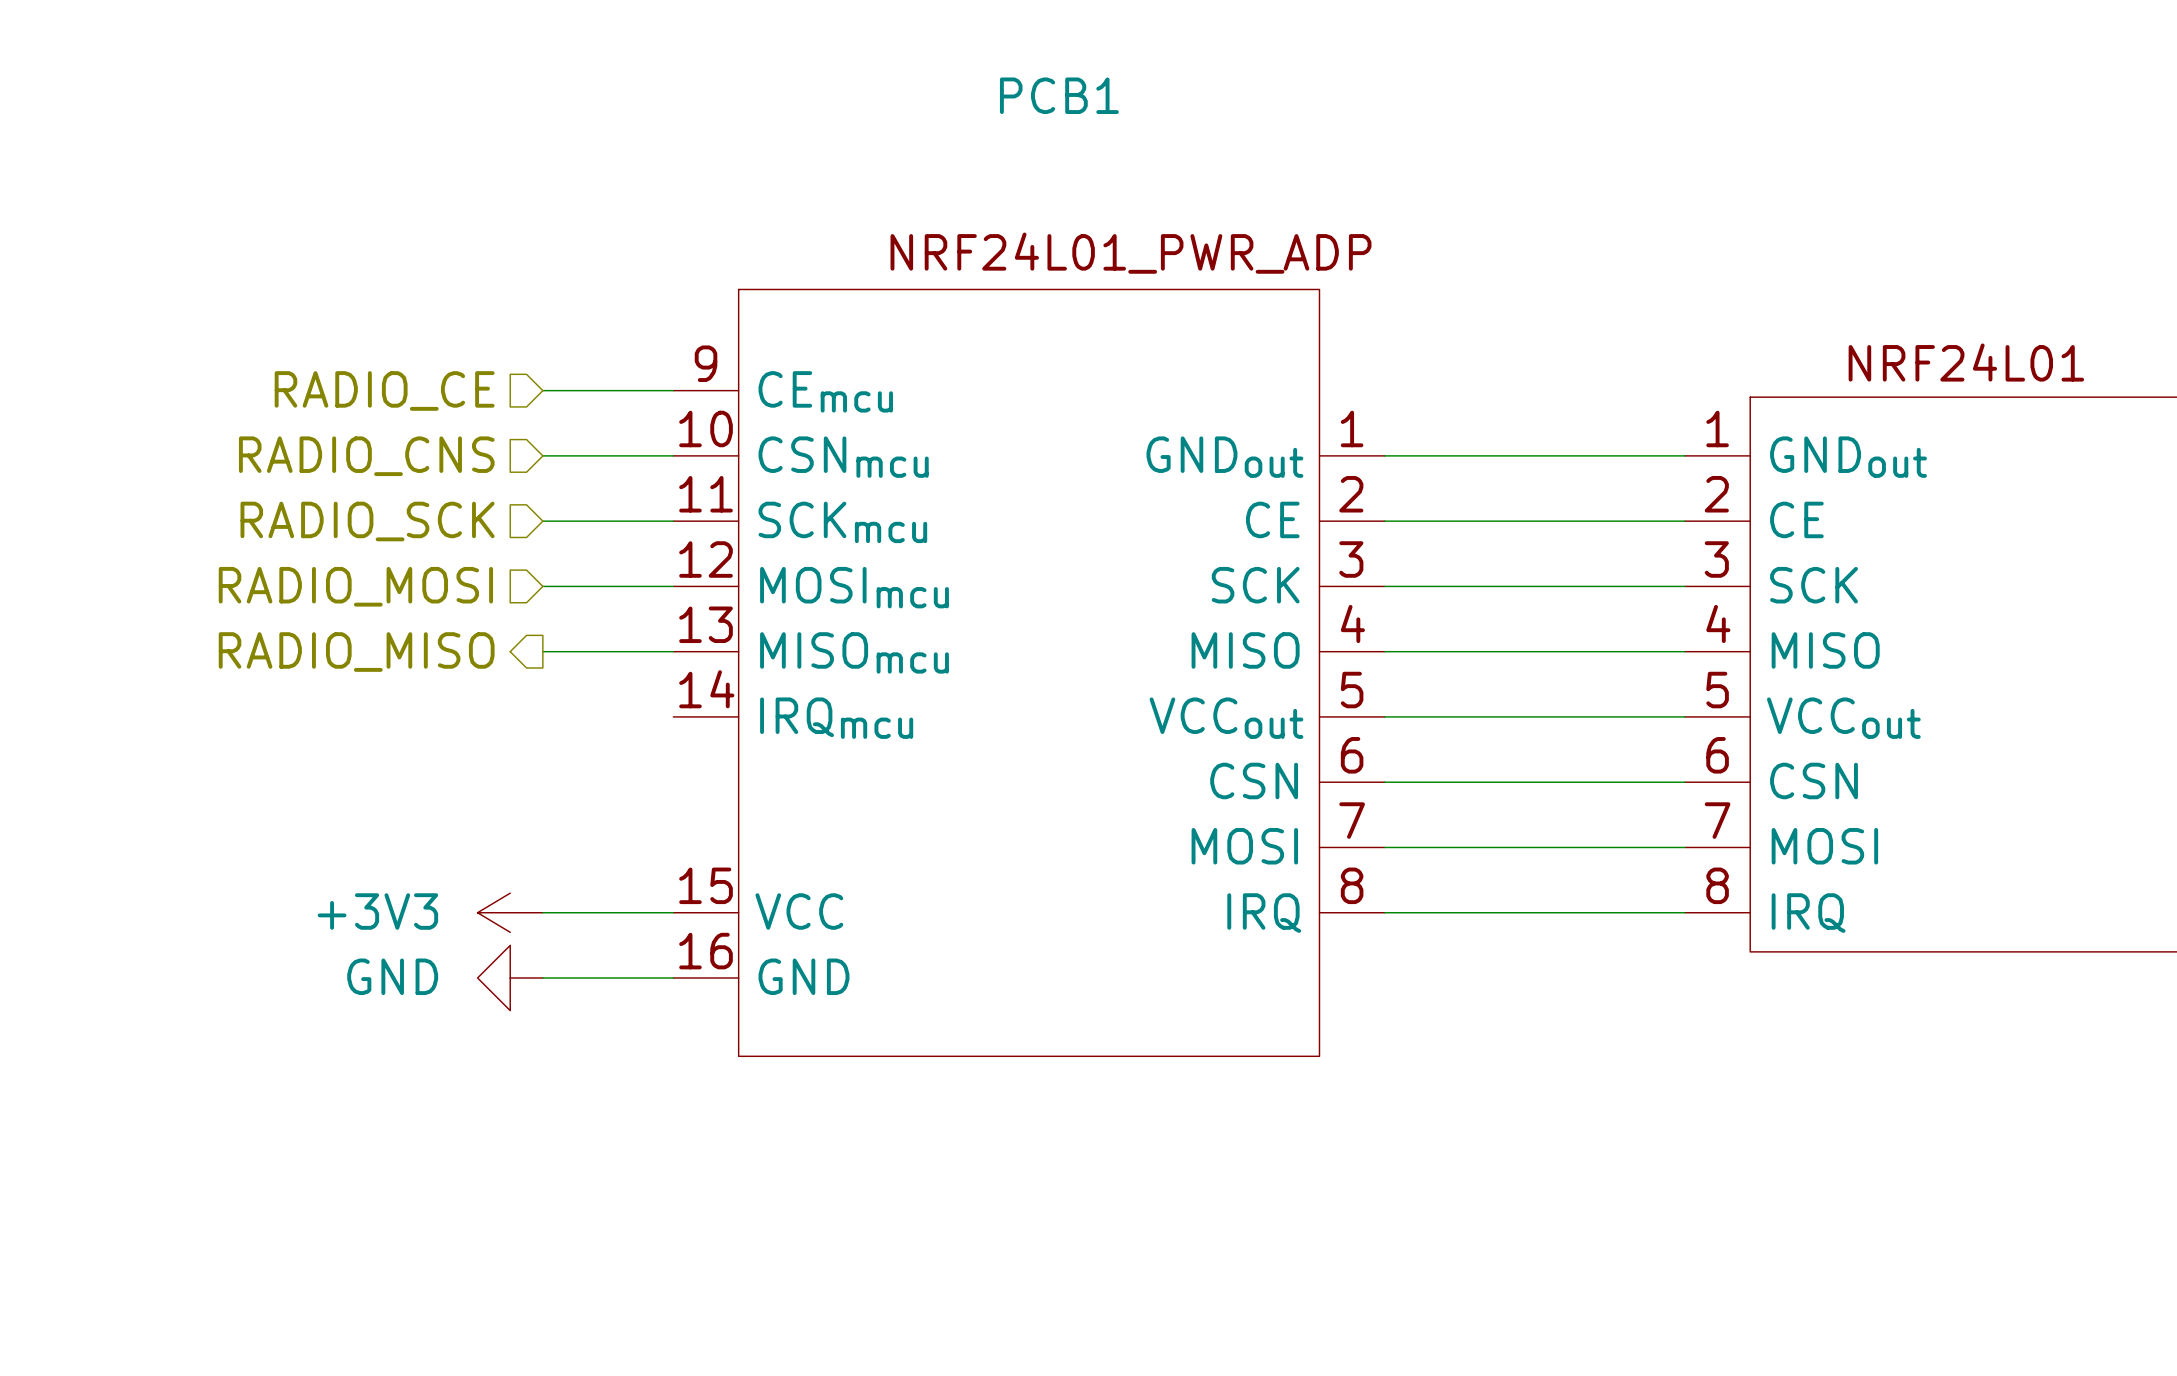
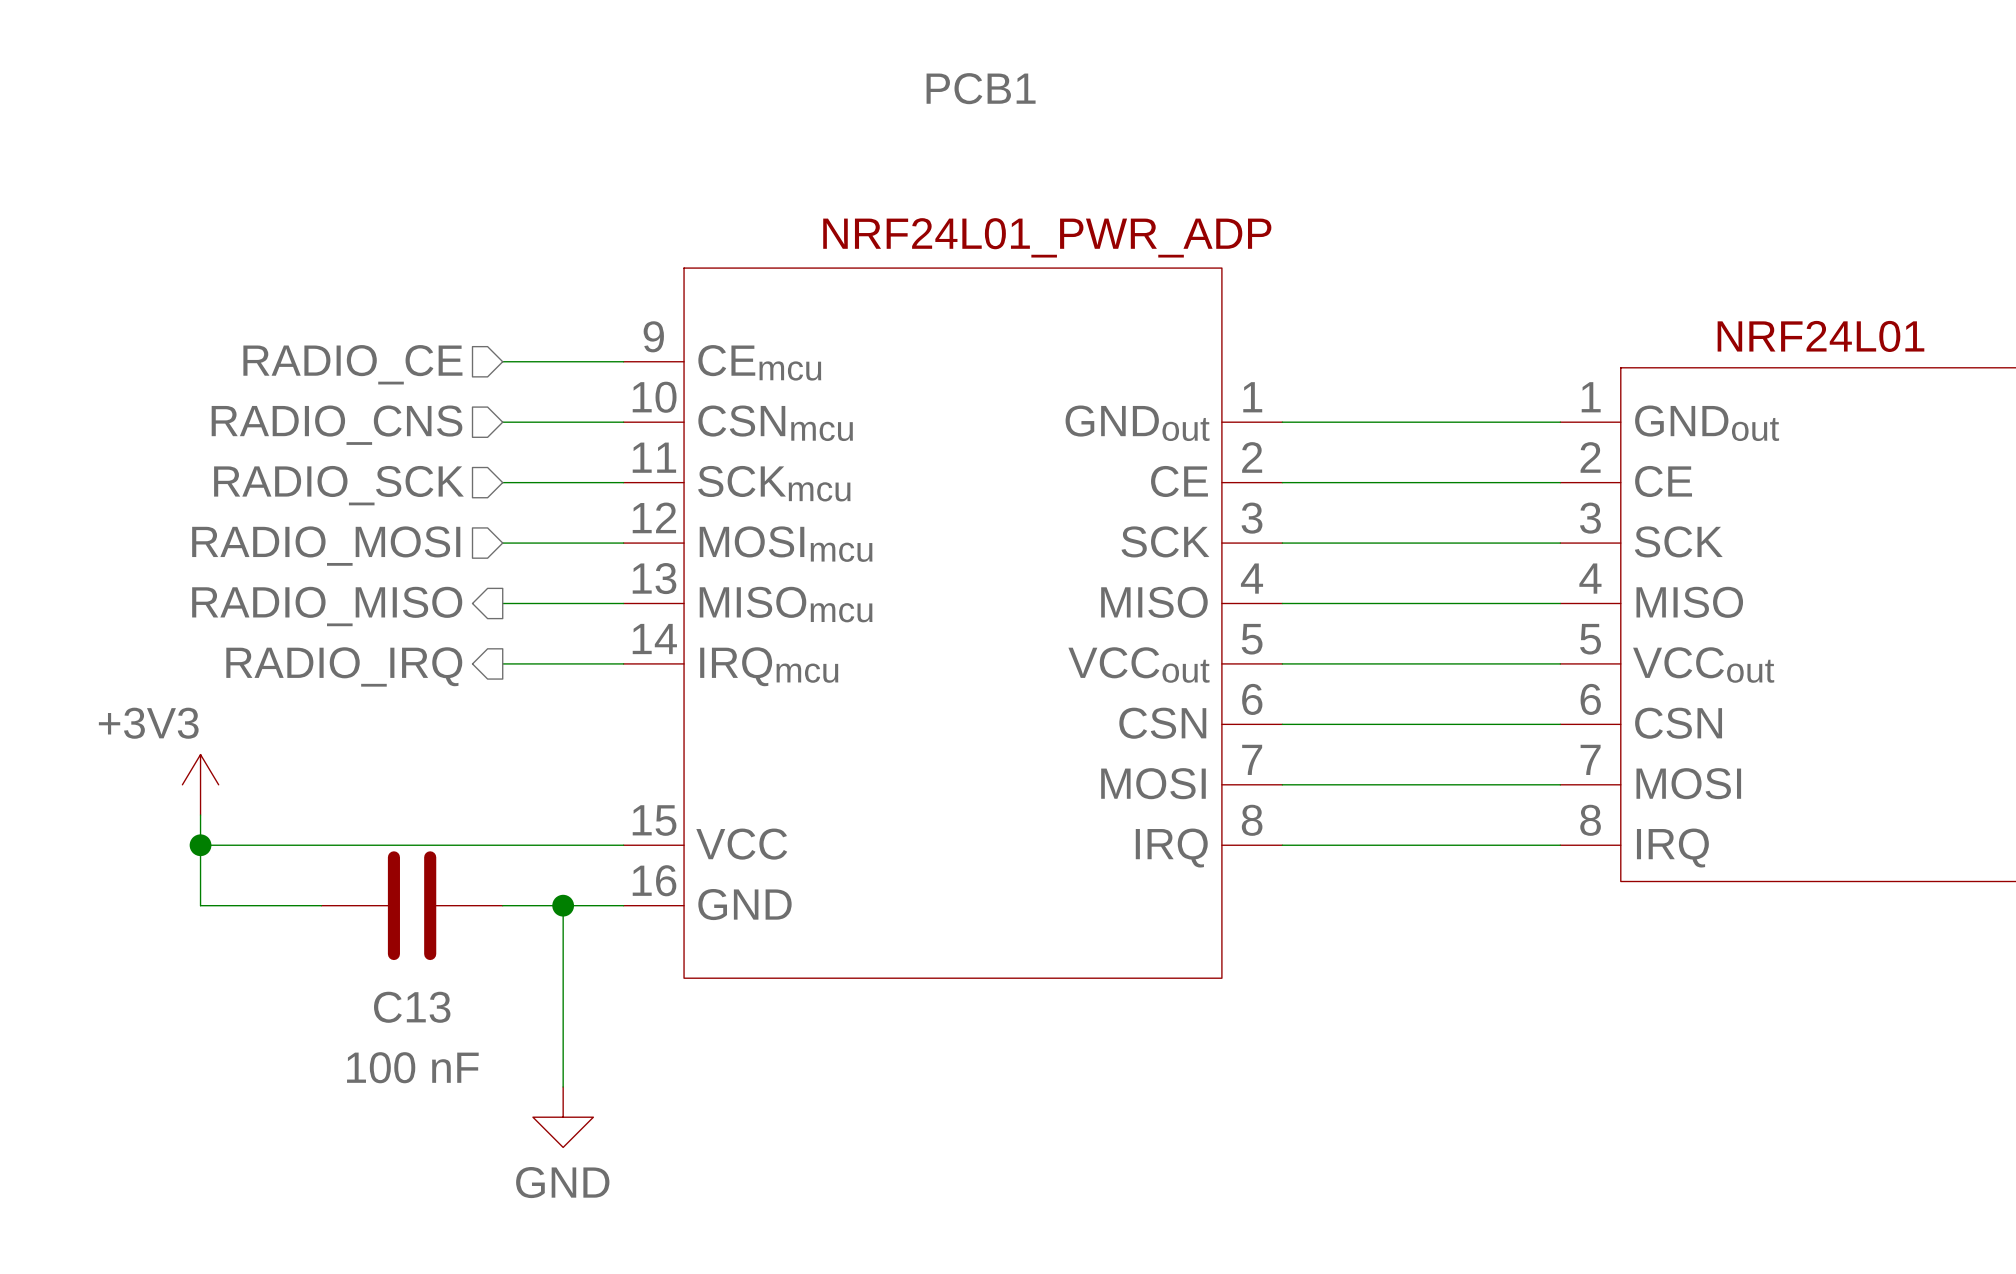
wire: none -> (502, 663) (623, 663)
hierarchical label: none -> RADIO_IRQ (344, 666)
wire: none -> (200, 815) (200, 905) (321, 905)
power symbol text position: +3V3 (377, 911) -> +3V3 (148, 723)
wire: none -> (200, 845) (502, 845)
junction: none -> (200, 845)
power symbol rotation: 0° (510, 912) -> 90° clockwise (200, 784)
power symbol position: +3V3 (510, 912) -> +3V3 (200, 784)
power symbol text position: GND (392, 976) -> GND (562, 1182)
C13: none -> 100 nF (412, 905)
power symbol rotation: 0° (510, 977) -> 90° counterclockwise (563, 1117)
power symbol position: GND (510, 977) -> GND (563, 1117)
wire: none -> (563, 905) (563, 1086)
junction: none -> (563, 905)

